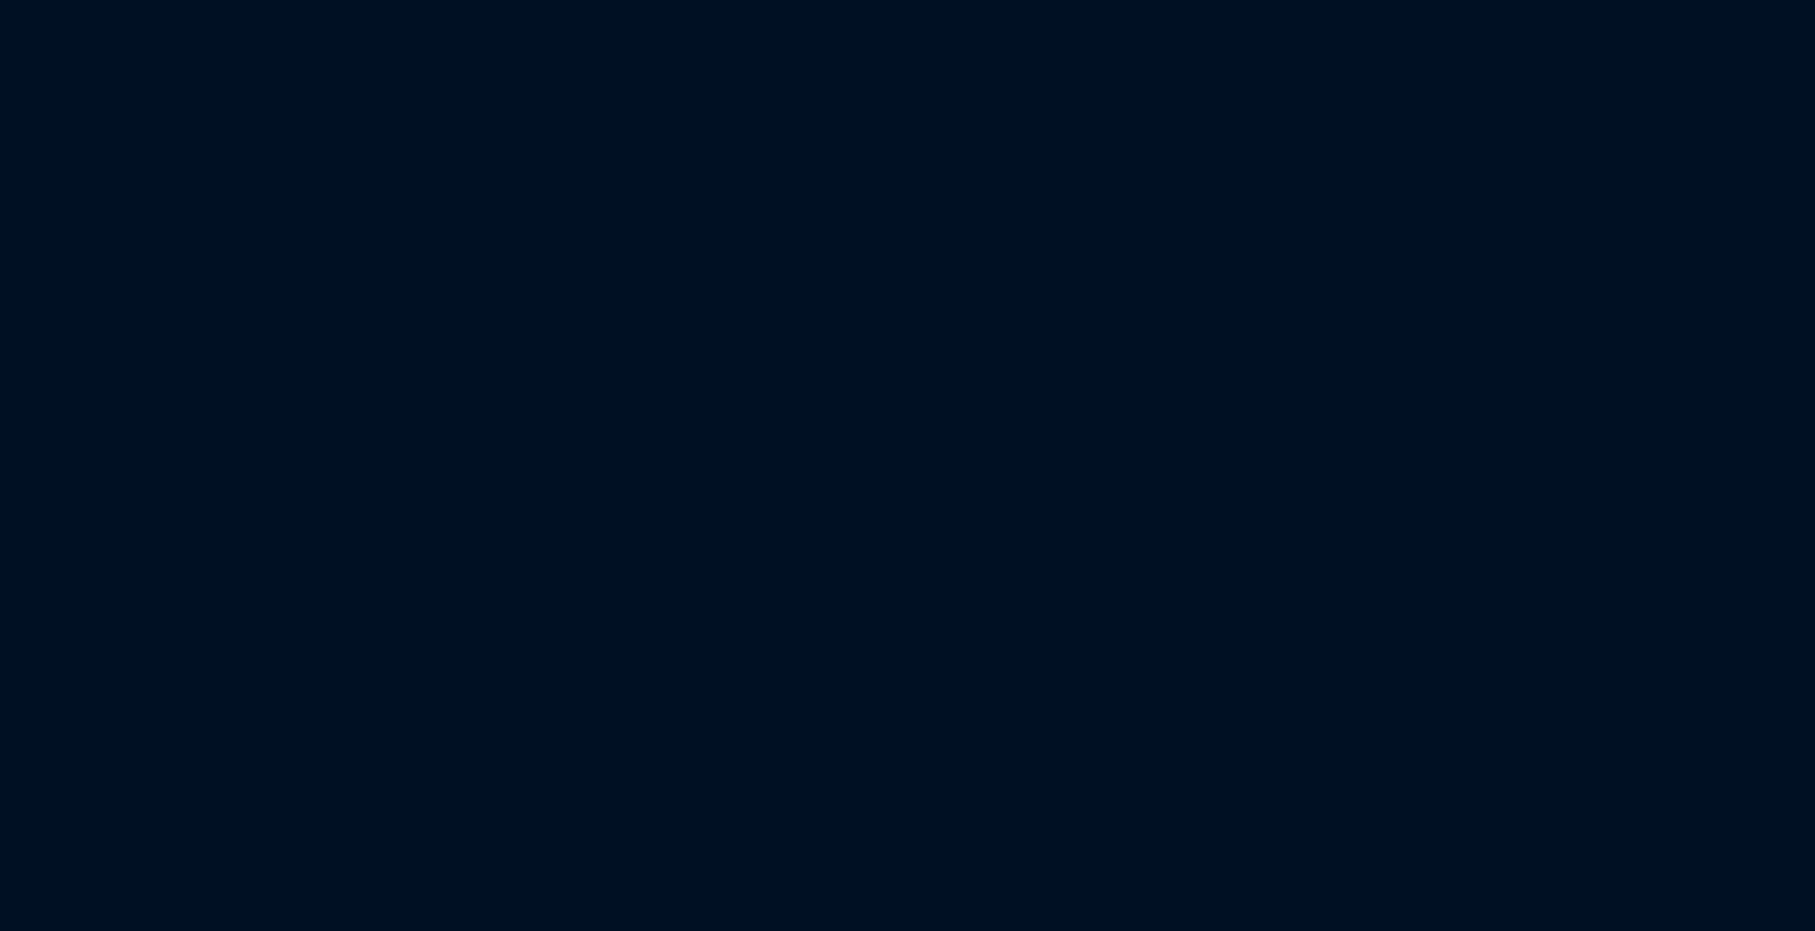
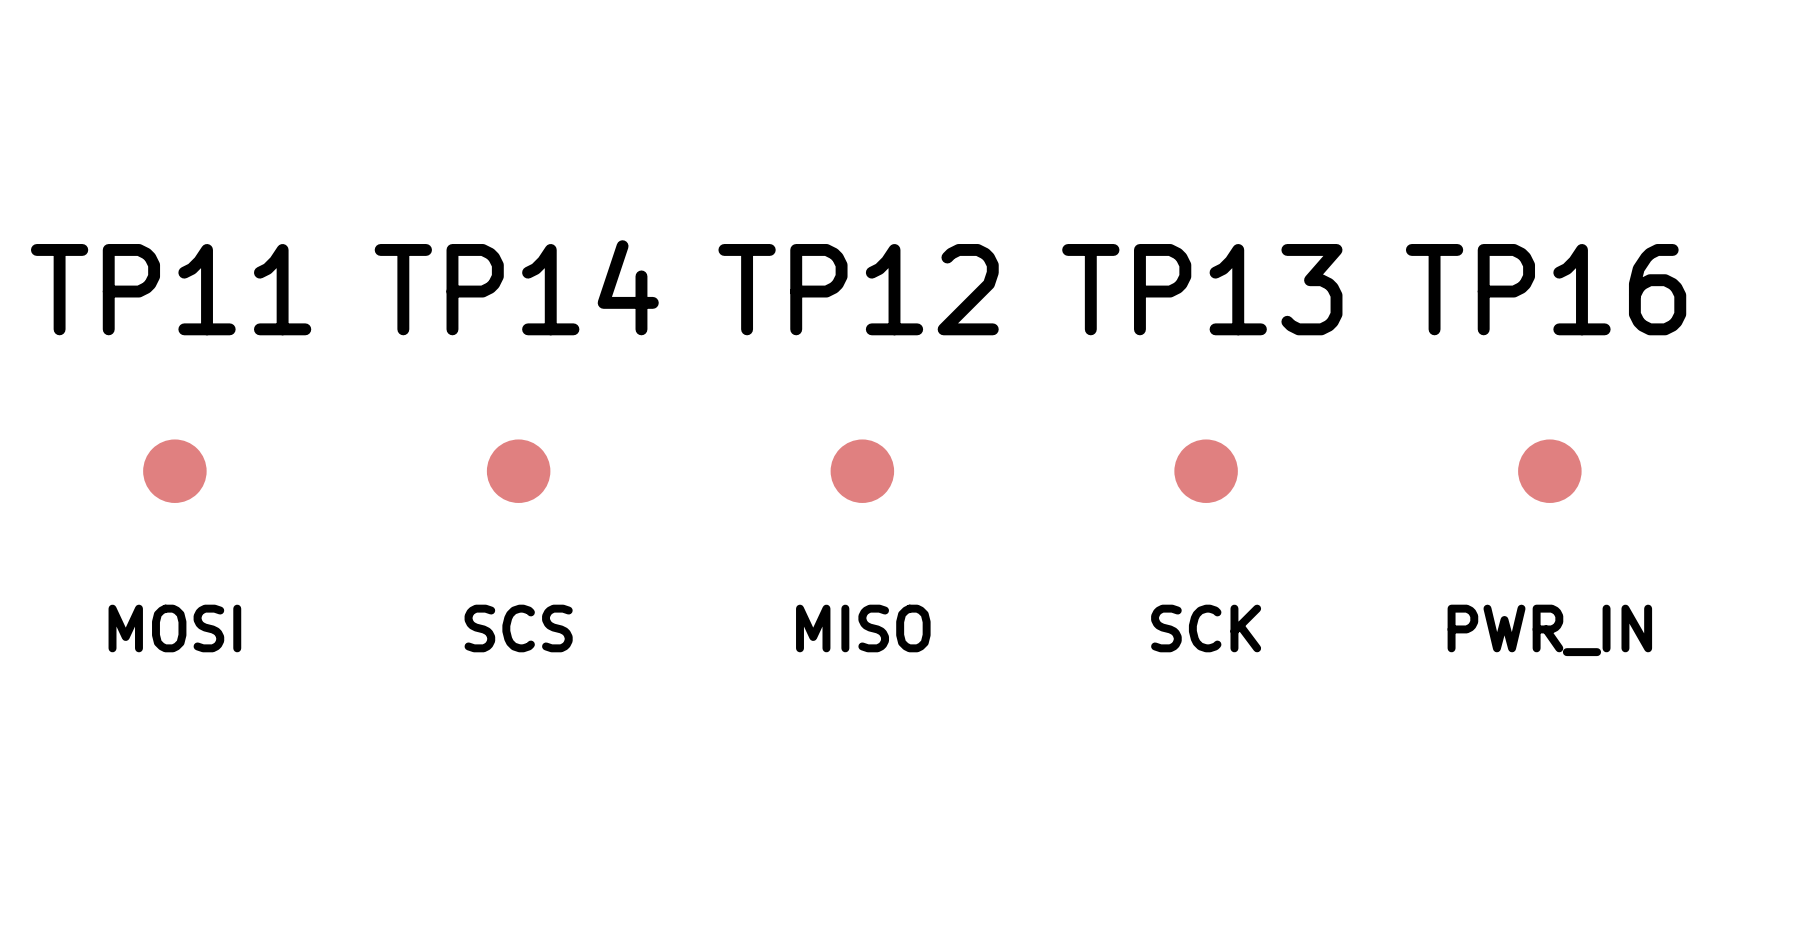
TP11: none -> MOSI (174, 471)
TP14: none -> SCS (518, 471)
TP12: none -> MISO (862, 471)
TP13: none -> SCK (1206, 471)
TP16: none -> PWR_IN (1549, 471)

